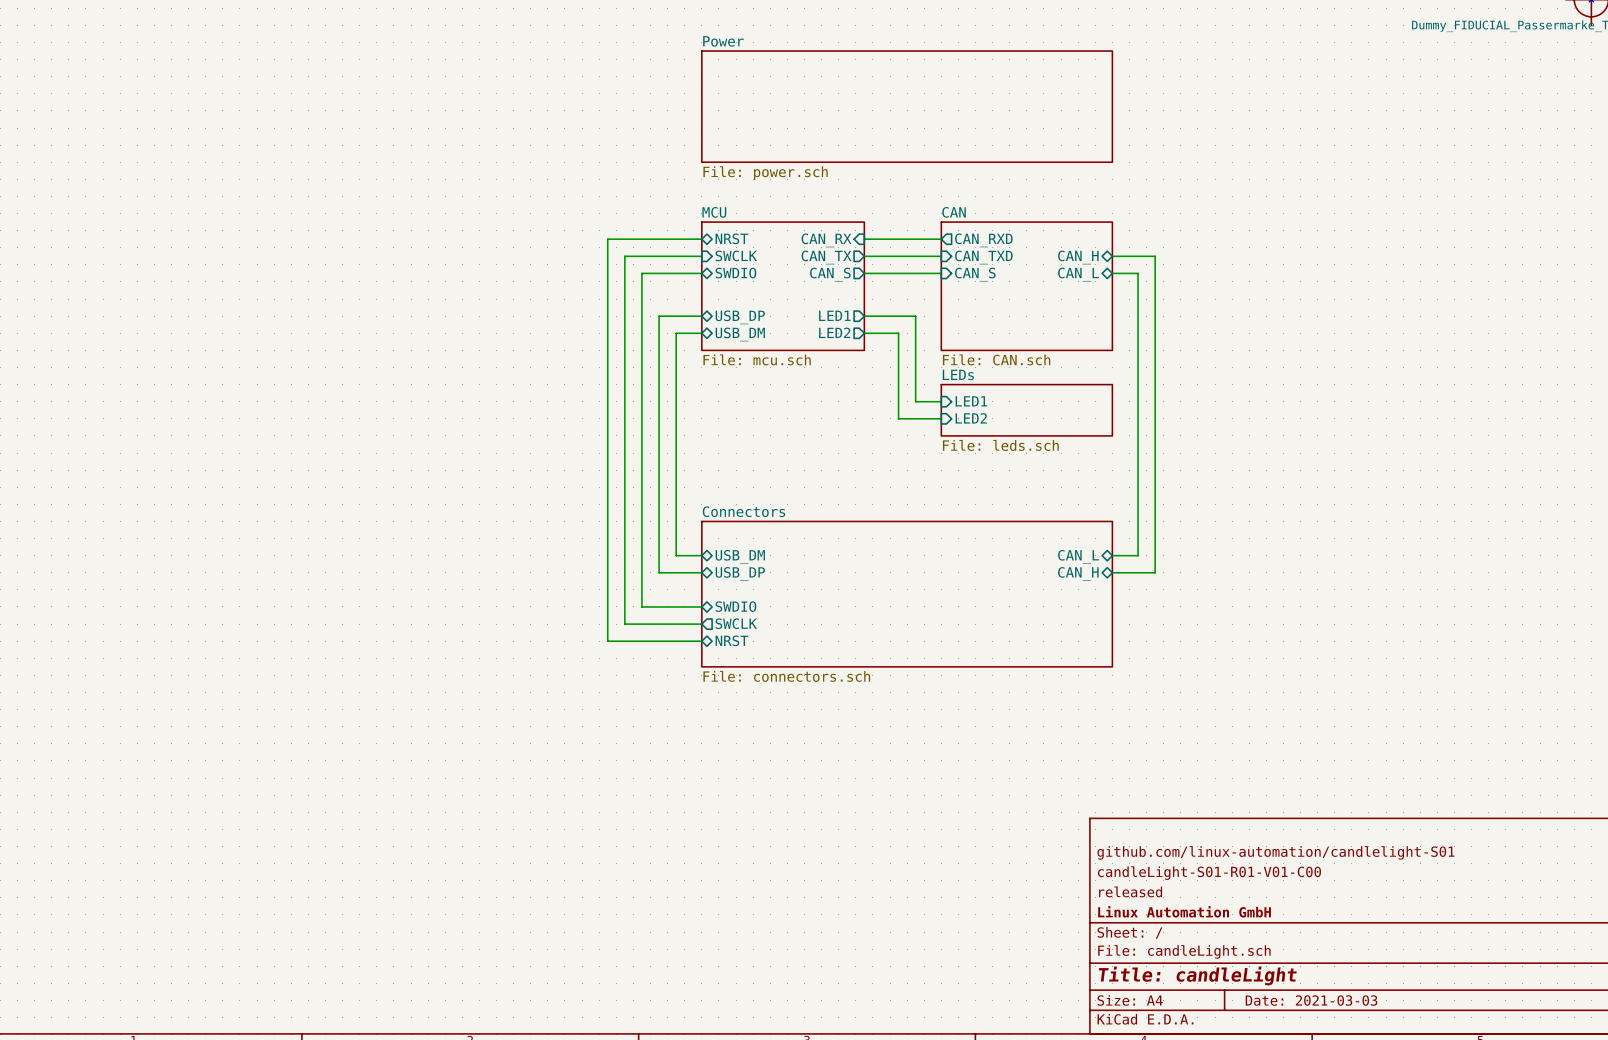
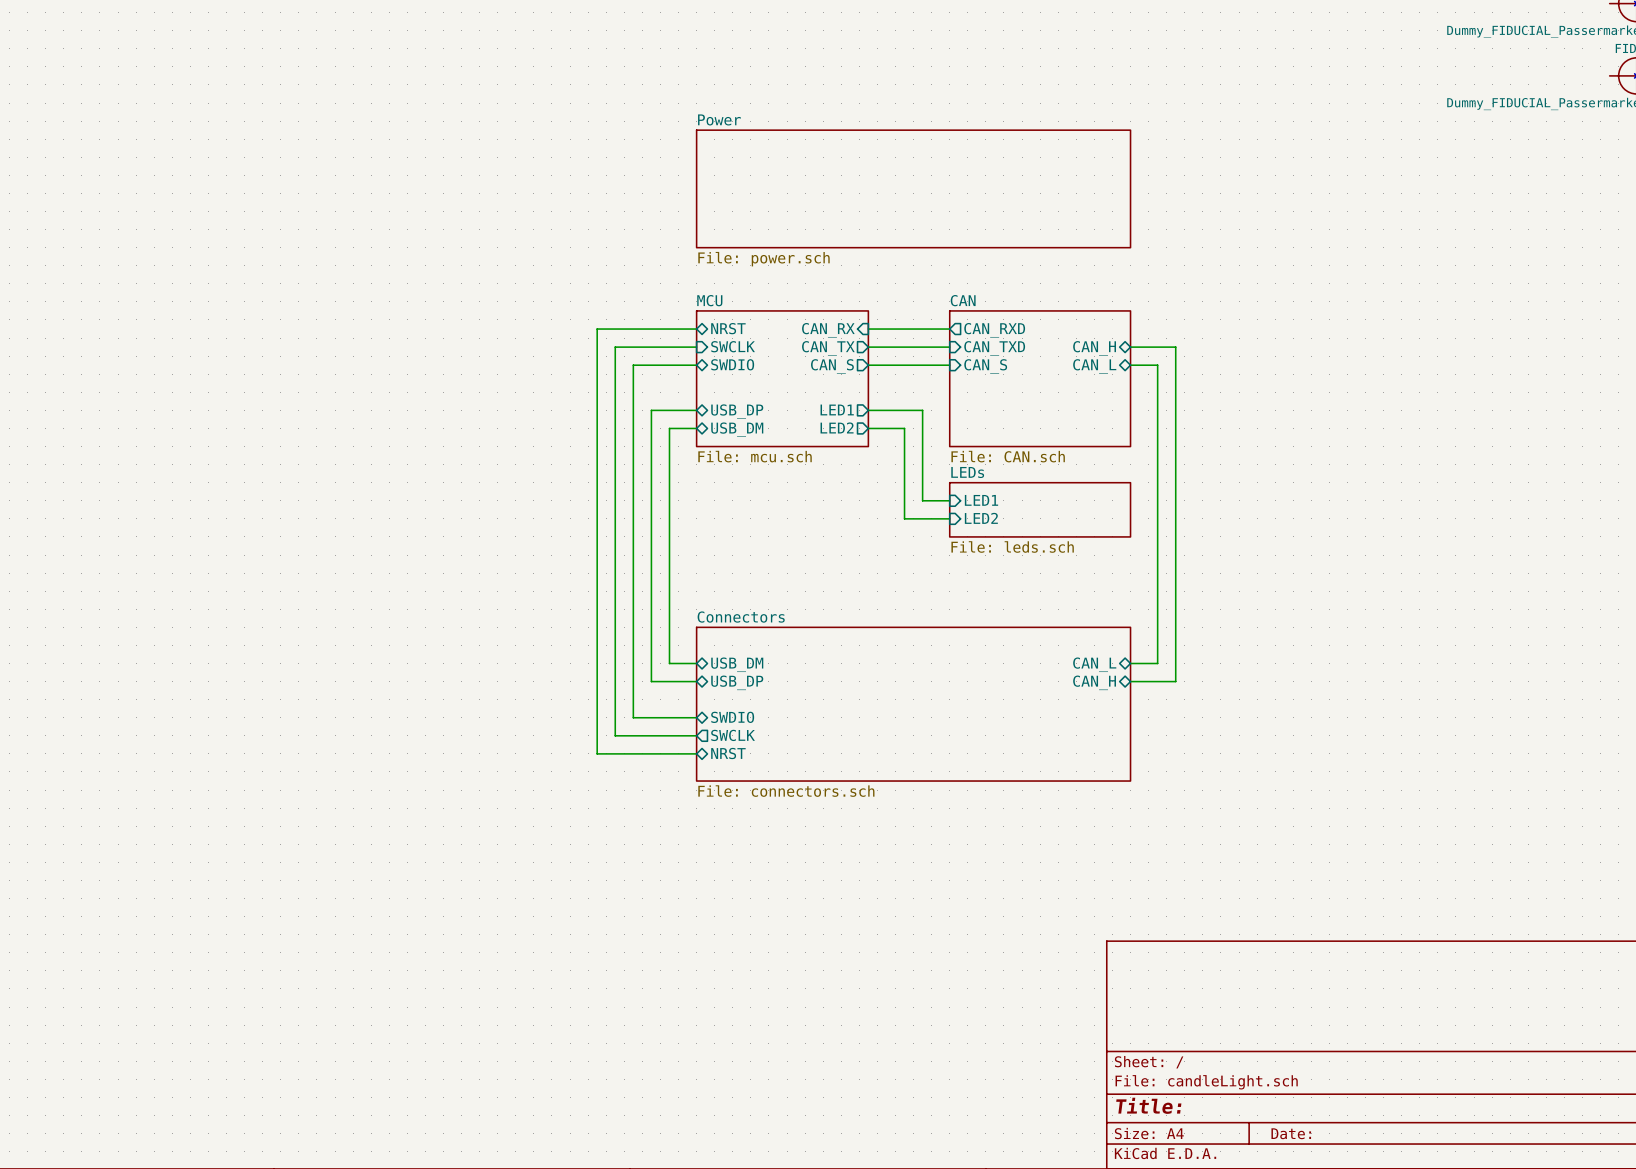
title block: github.com/linux-automation/candlelight-S01 (1275, 852) -> none
title block: candleLight-S01-R01-V01-C00 (1209, 873) -> none
title block: released (1130, 891) -> none
title block: Linux Automation GmbH (1184, 911) -> none
title block: Title: candleLight (1197, 975) -> Title: (1148, 1105)
title block: Date: 2021-03-03 (1311, 1000) -> Date: (1291, 1133)

